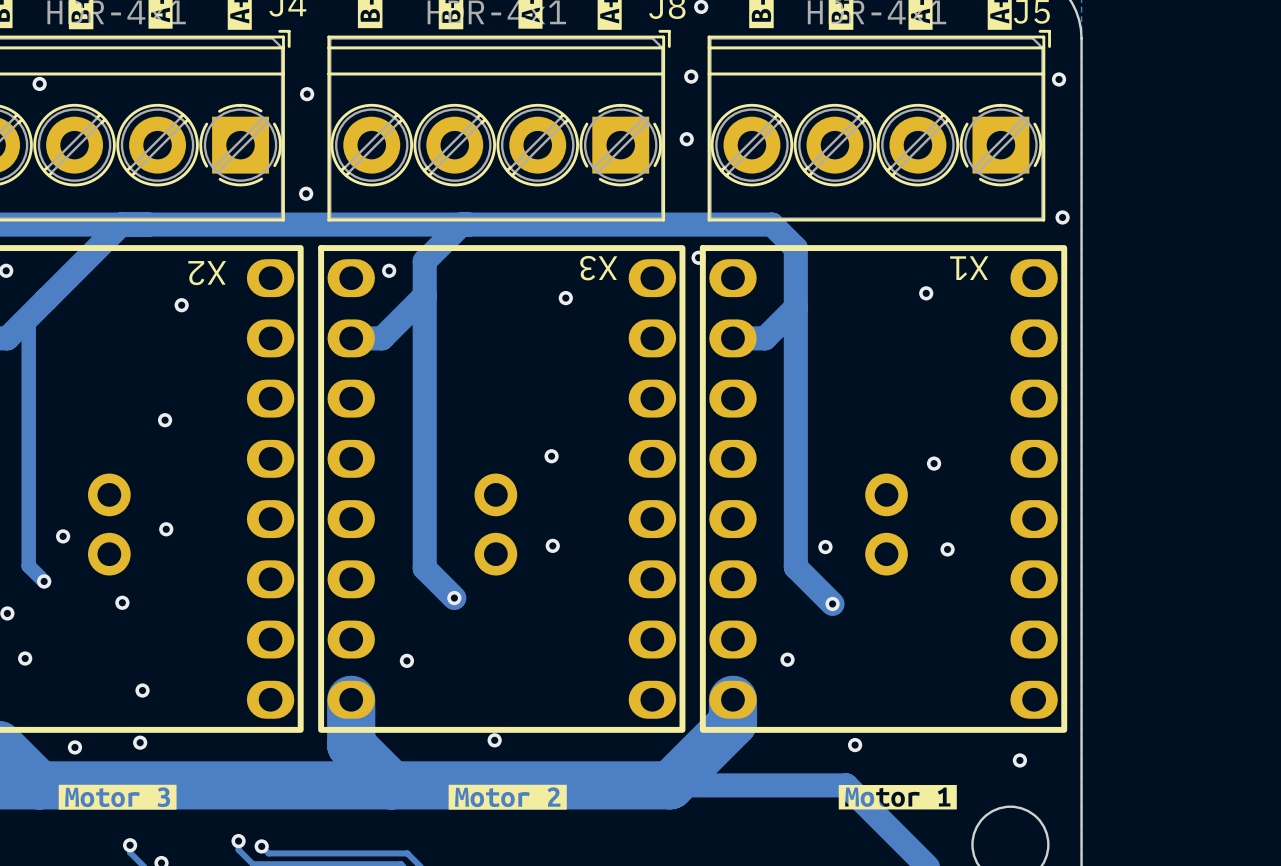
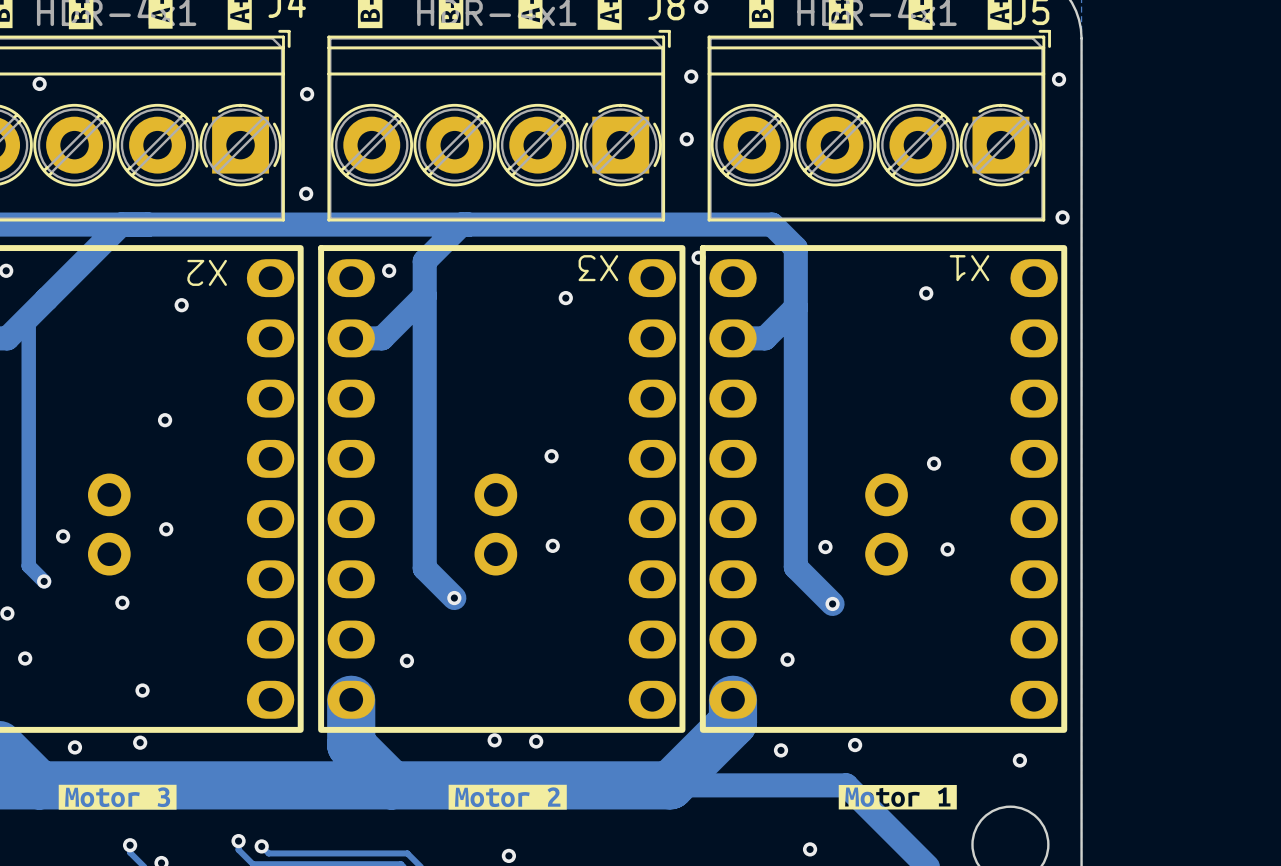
via: none -> (536, 741)
via: none -> (781, 750)
via: none -> (810, 849)
via: none -> (508, 855)

